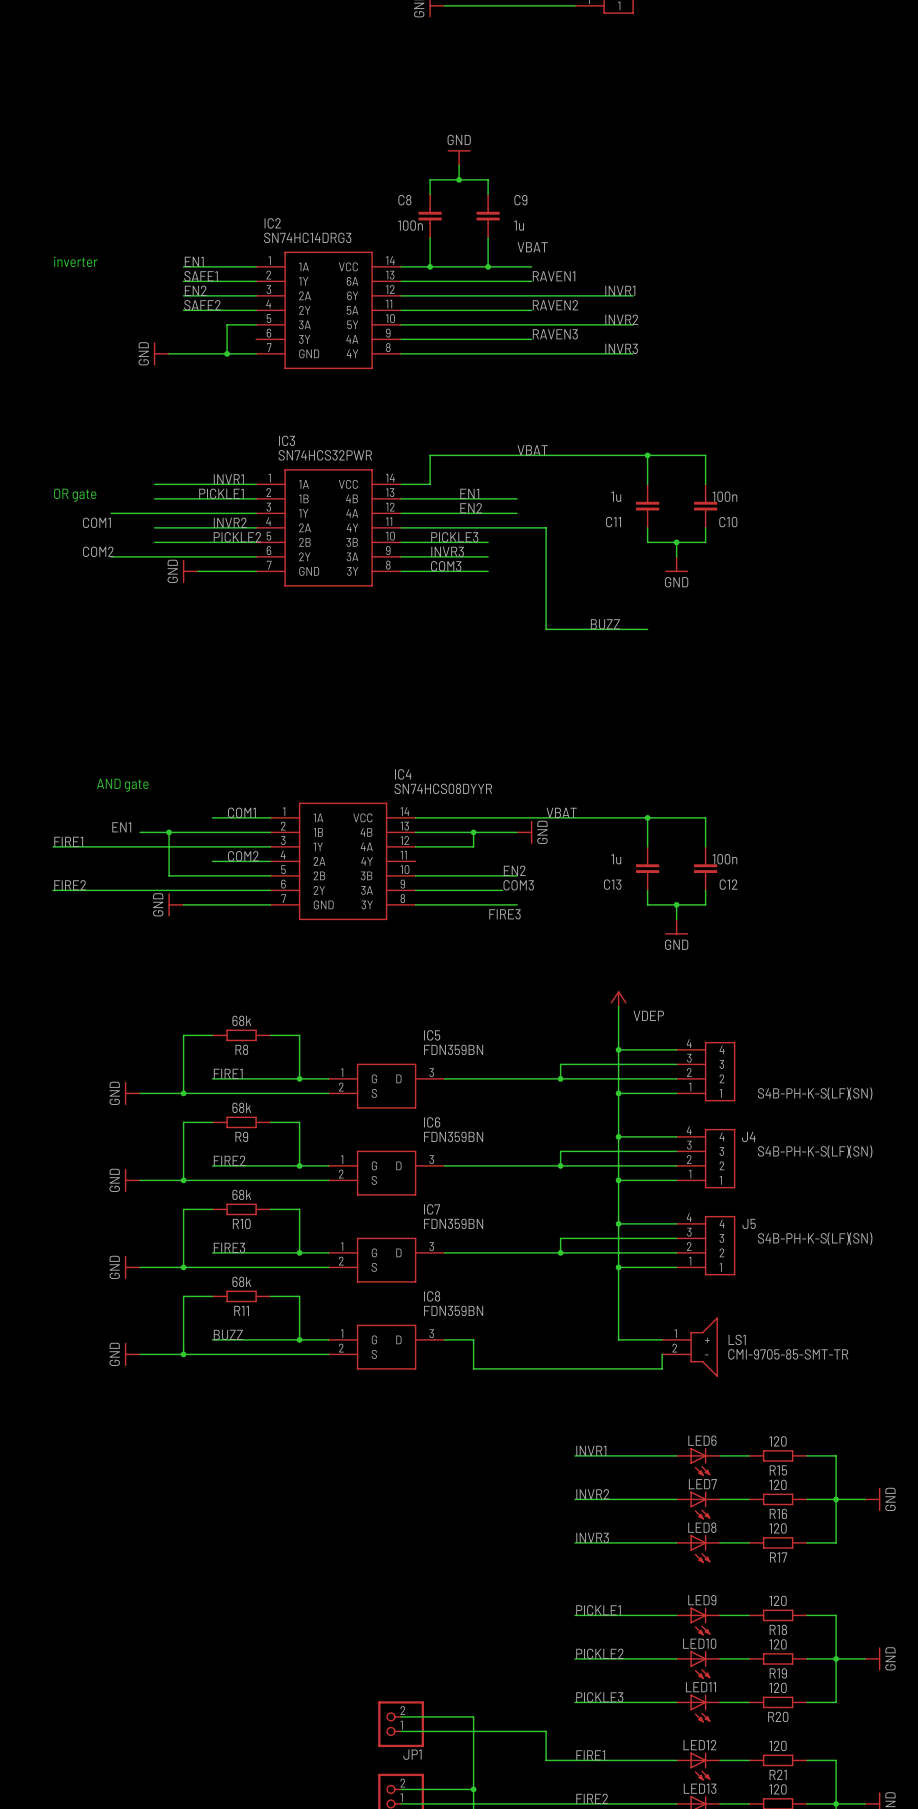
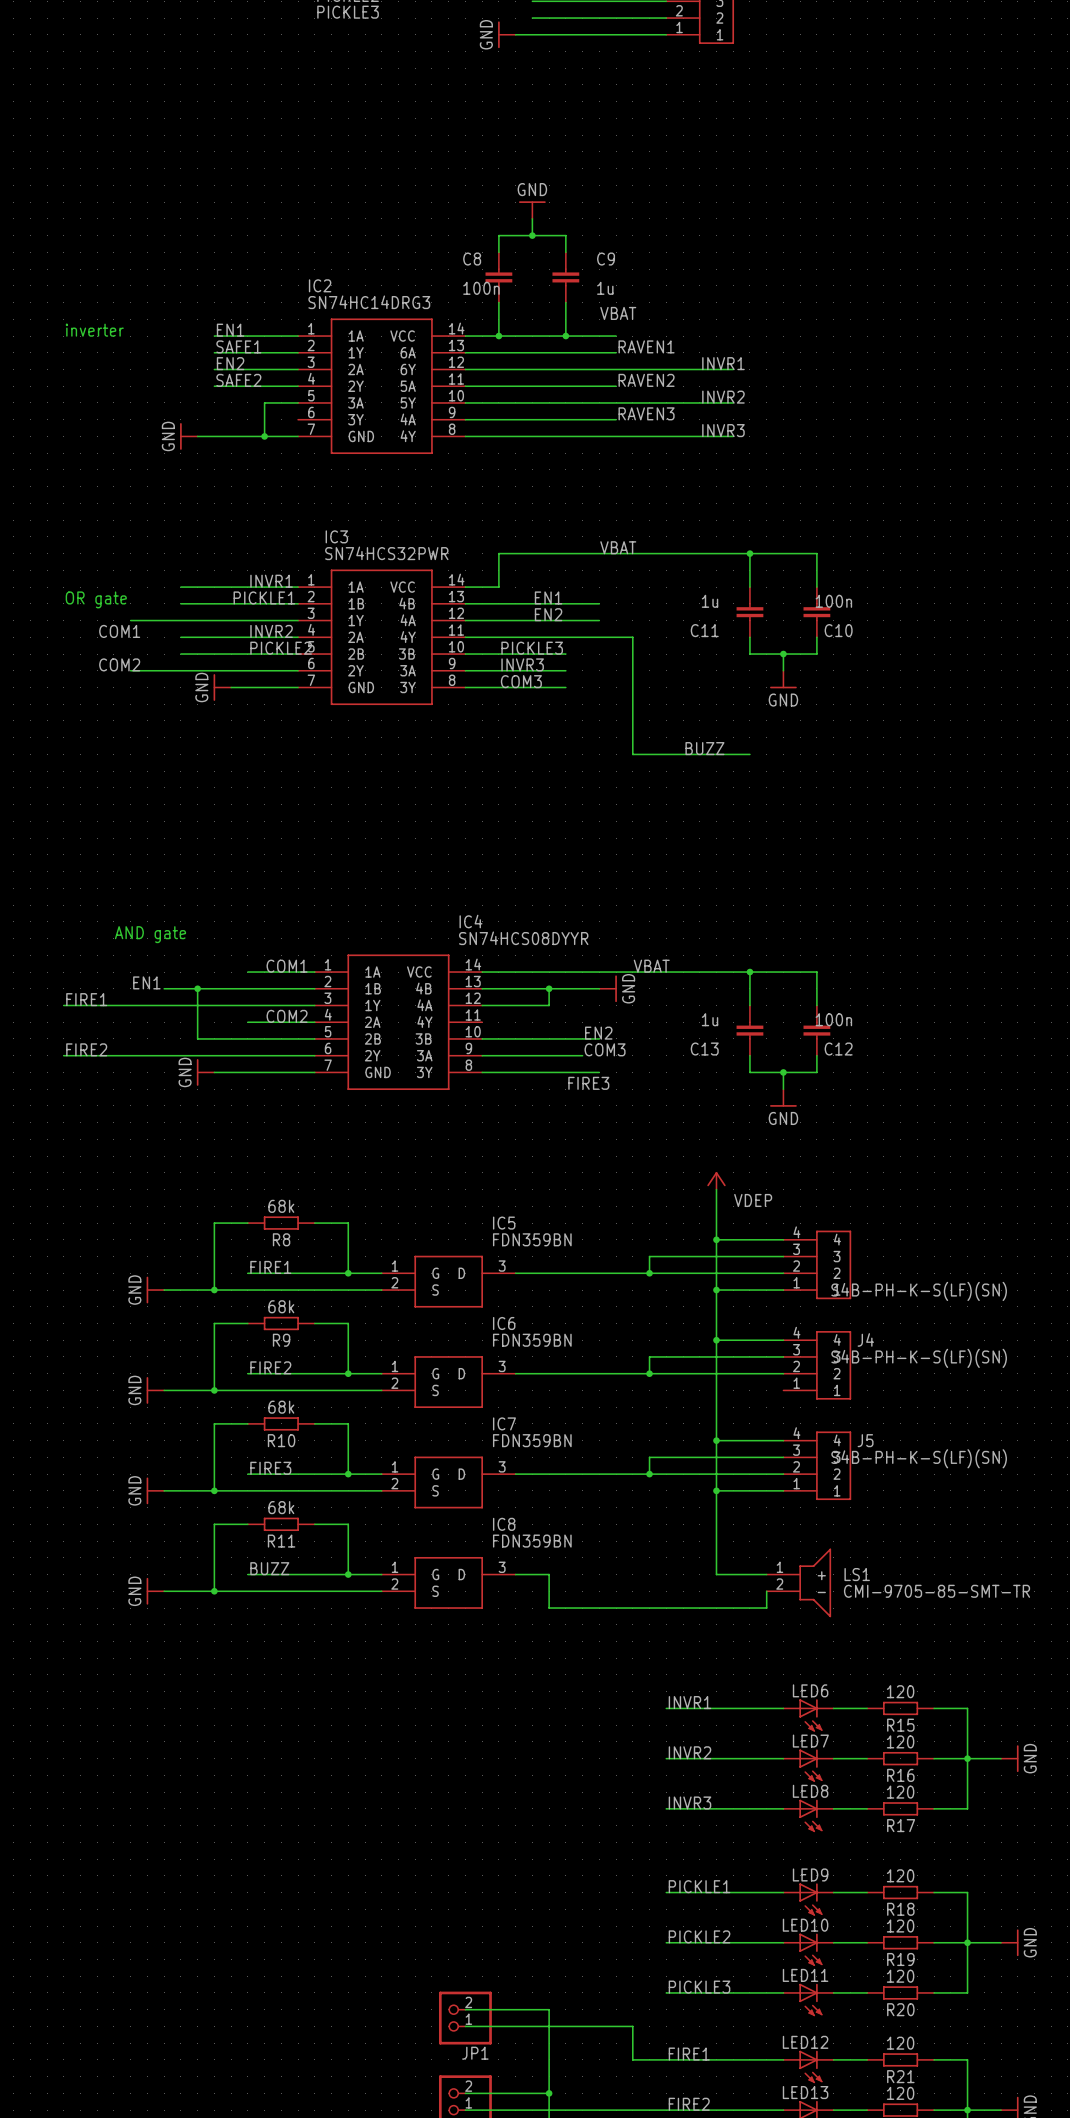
wire: (618, 1180) (676, 1180) -> none
junction: (618, 1180) -> none

